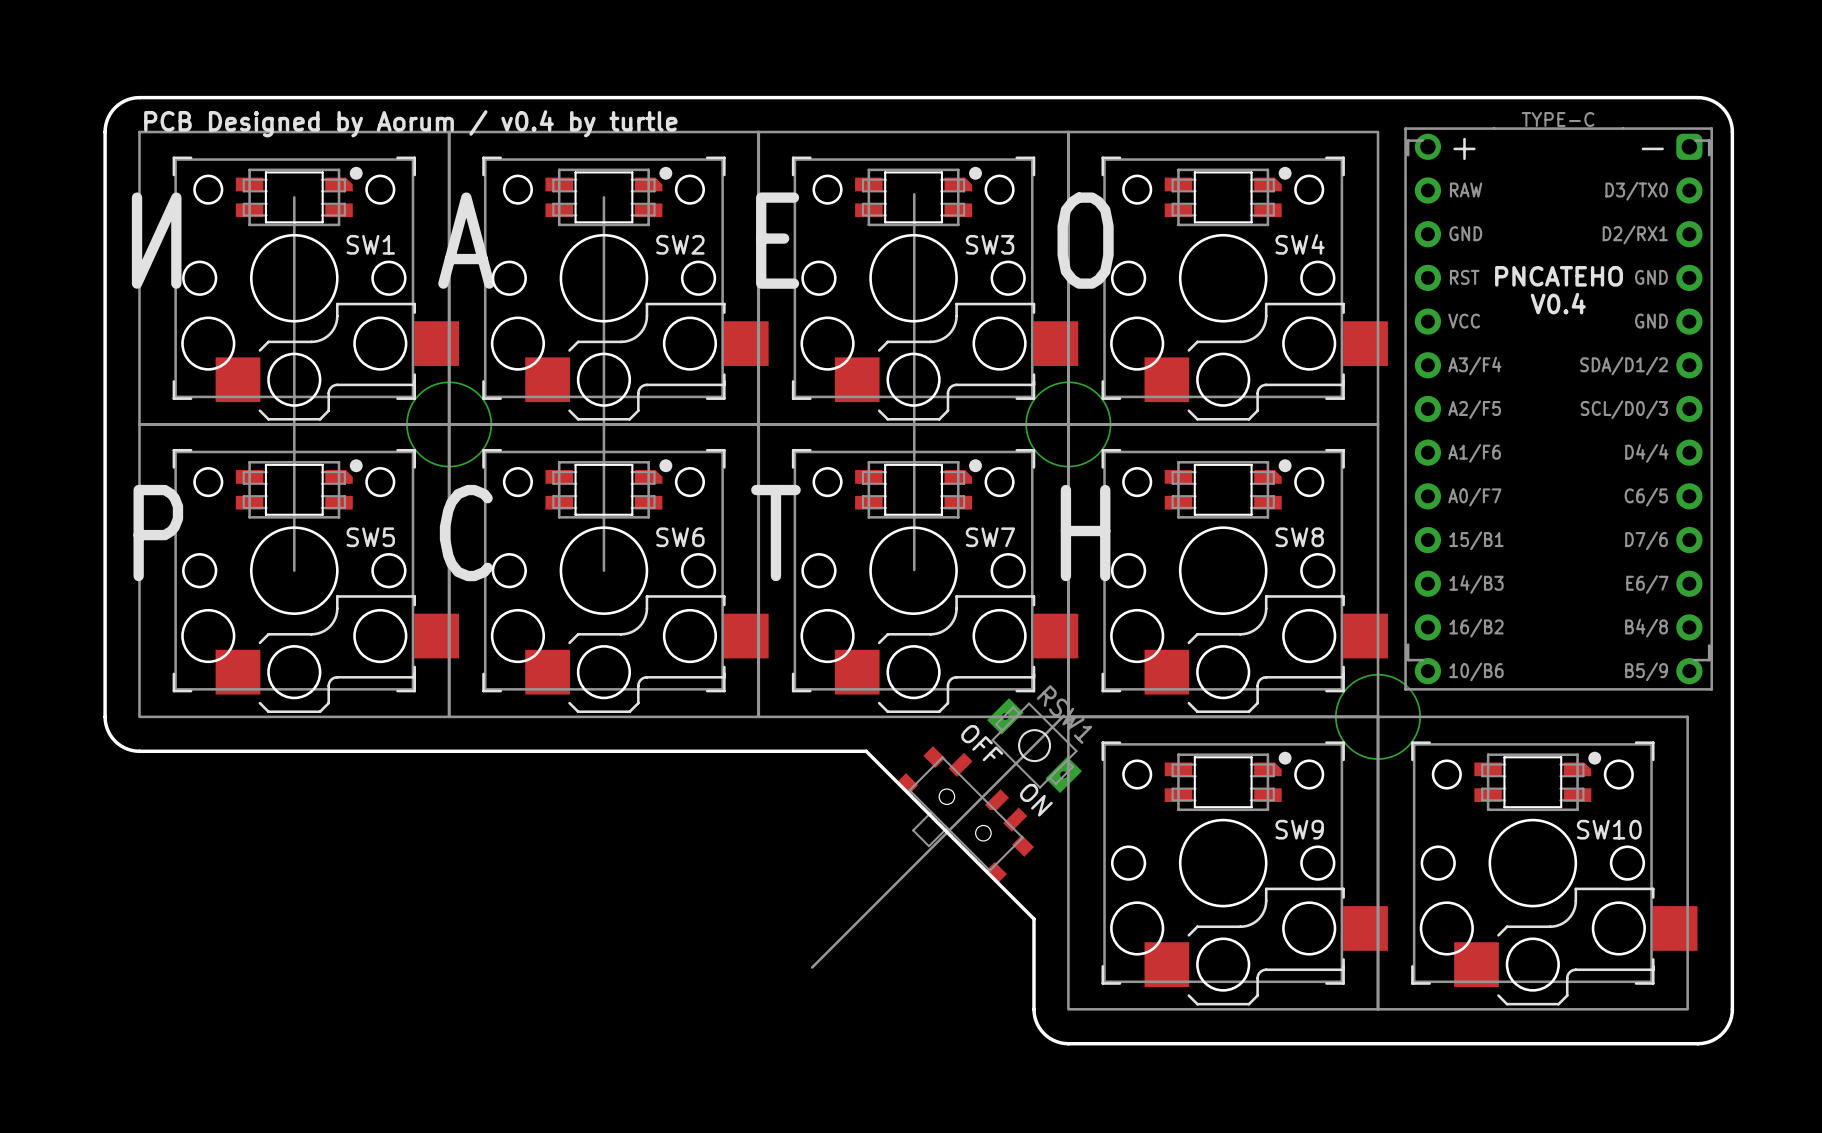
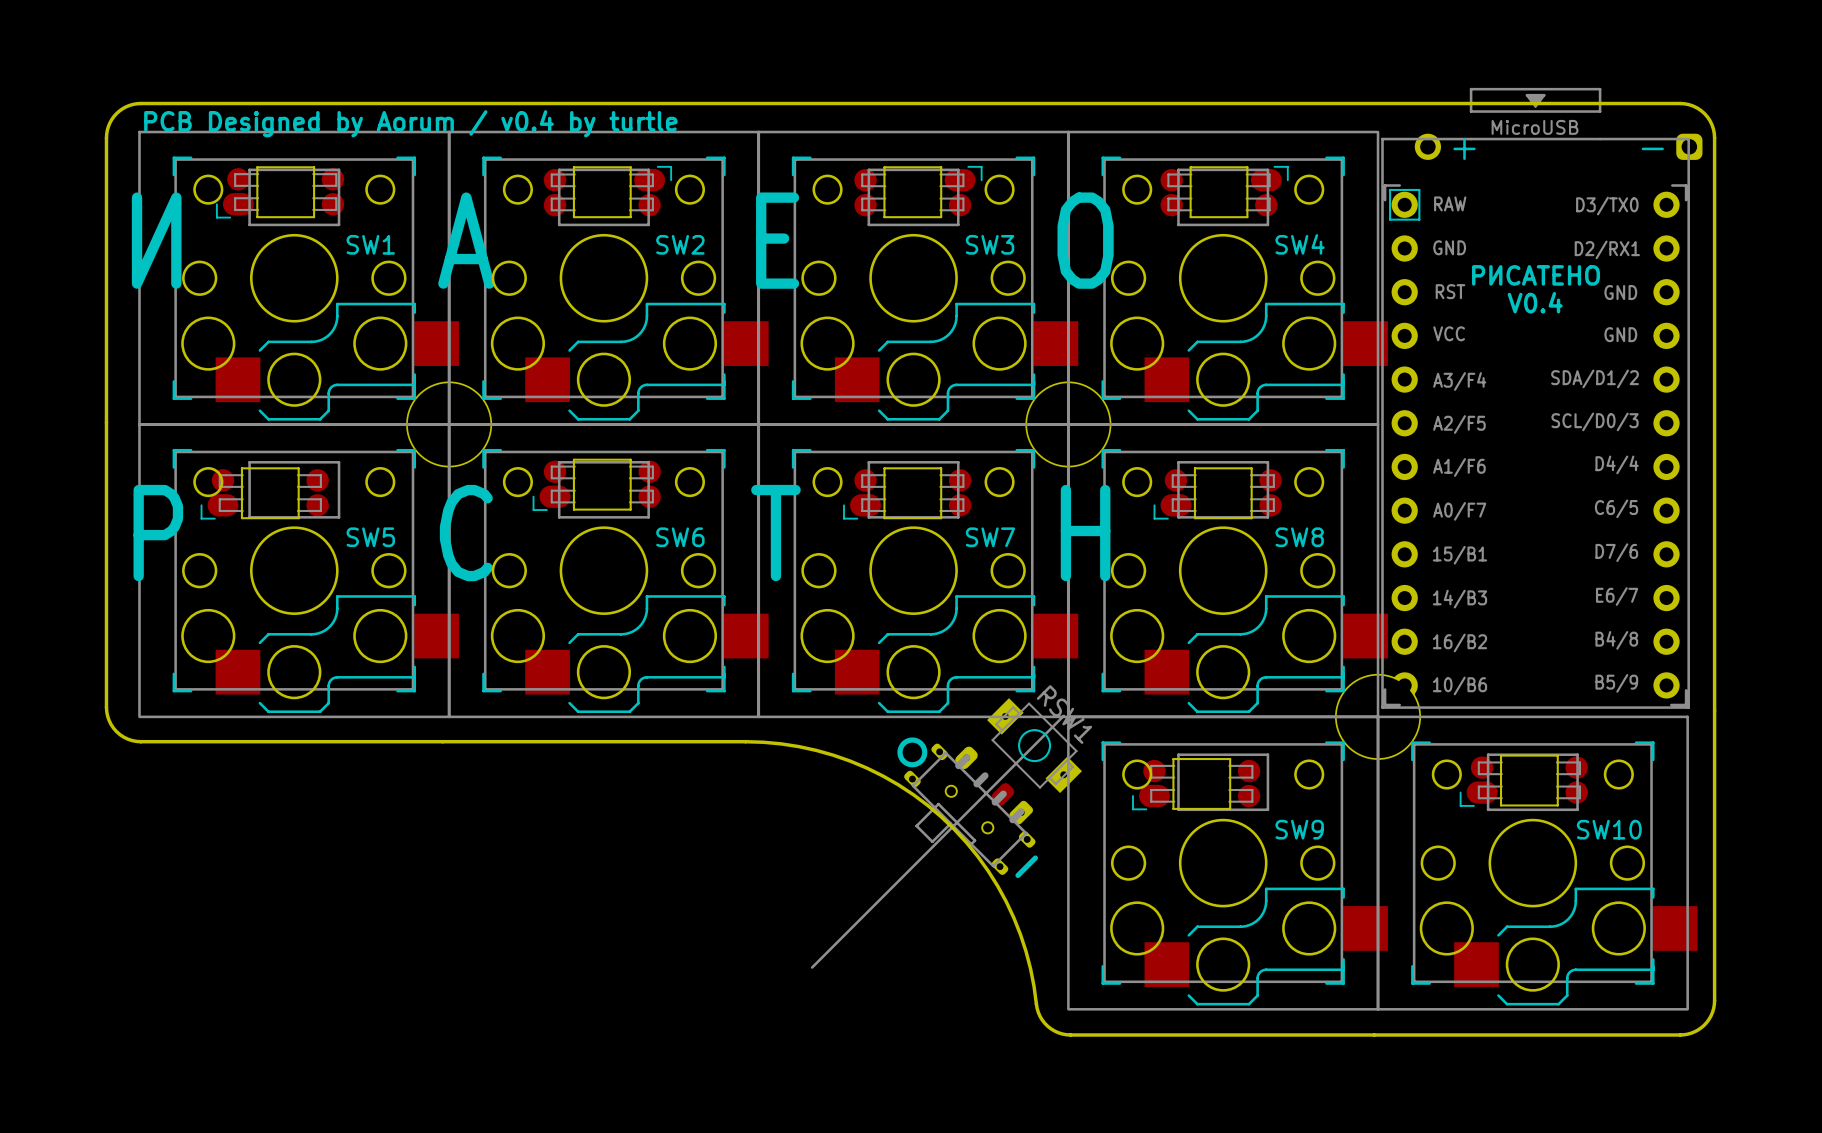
board edge: (139, 97) (1697, 97) (1716, 102) (1728, 117) (1732, 132) (1732, 1009) (1727, 1027) (1716, 1038) (1697, 1043) (1060, 1042) (1044, 1033) (1034, 1016) (1033, 919) (866, 751) (139, 751) (121, 746) (110, 735) (105, 716) (105, 132) (108, 117) (115, 107) (128, 99) (139, 97) -> (140, 103) (125, 106) (116, 113) (108, 126) (106, 137) (106, 707) (111, 724) (123, 737) (140, 741) (745, 741) (798, 746) (833, 755) (866, 768) (913, 794) (941, 817) (966, 842) (997, 886) (1013, 917) (1026, 951) (1039, 1016) (1050, 1028) (1066, 1034) (1680, 1034) (1695, 1031) (1709, 1018) (1714, 1000) (1714, 137) (1709, 120) (1697, 108) (1680, 103) (140, 103)
part footprint: [545, 166, 673, 224] -> [543, 165, 672, 219]
part footprint: [855, 166, 982, 224] -> [854, 165, 983, 219]
part footprint: [1164, 166, 1292, 224] -> [1160, 165, 1289, 219]
part: none -> (280, 192)
line: (914, 194) (914, 570) -> none
part: (299, 195) -> none
line: (294, 197) (294, 570) -> none
line: (603, 197) (603, 570) -> none
text: none -> РИСАТЕНО (1536, 275)
text: PNCATEHO (1559, 276) -> none
text position: V0.4 (1558, 303) -> V0.4 (1535, 302)
part: none -> (1535, 398)
part: (1558, 408) -> none
part footprint: [545, 459, 673, 516] -> [532, 458, 661, 511]
part footprint: [855, 459, 982, 516] -> [843, 467, 972, 520]
part footprint: [1164, 459, 1292, 516] -> [1153, 467, 1282, 520]
part: (299, 487) -> none
part: none -> (264, 493)
part footprint: [896, 746, 1034, 884] -> [897, 737, 1039, 879]
part footprint: [1474, 751, 1602, 809] -> [1459, 754, 1588, 807]
part: (1228, 779) -> none
part: none -> (1196, 784)

